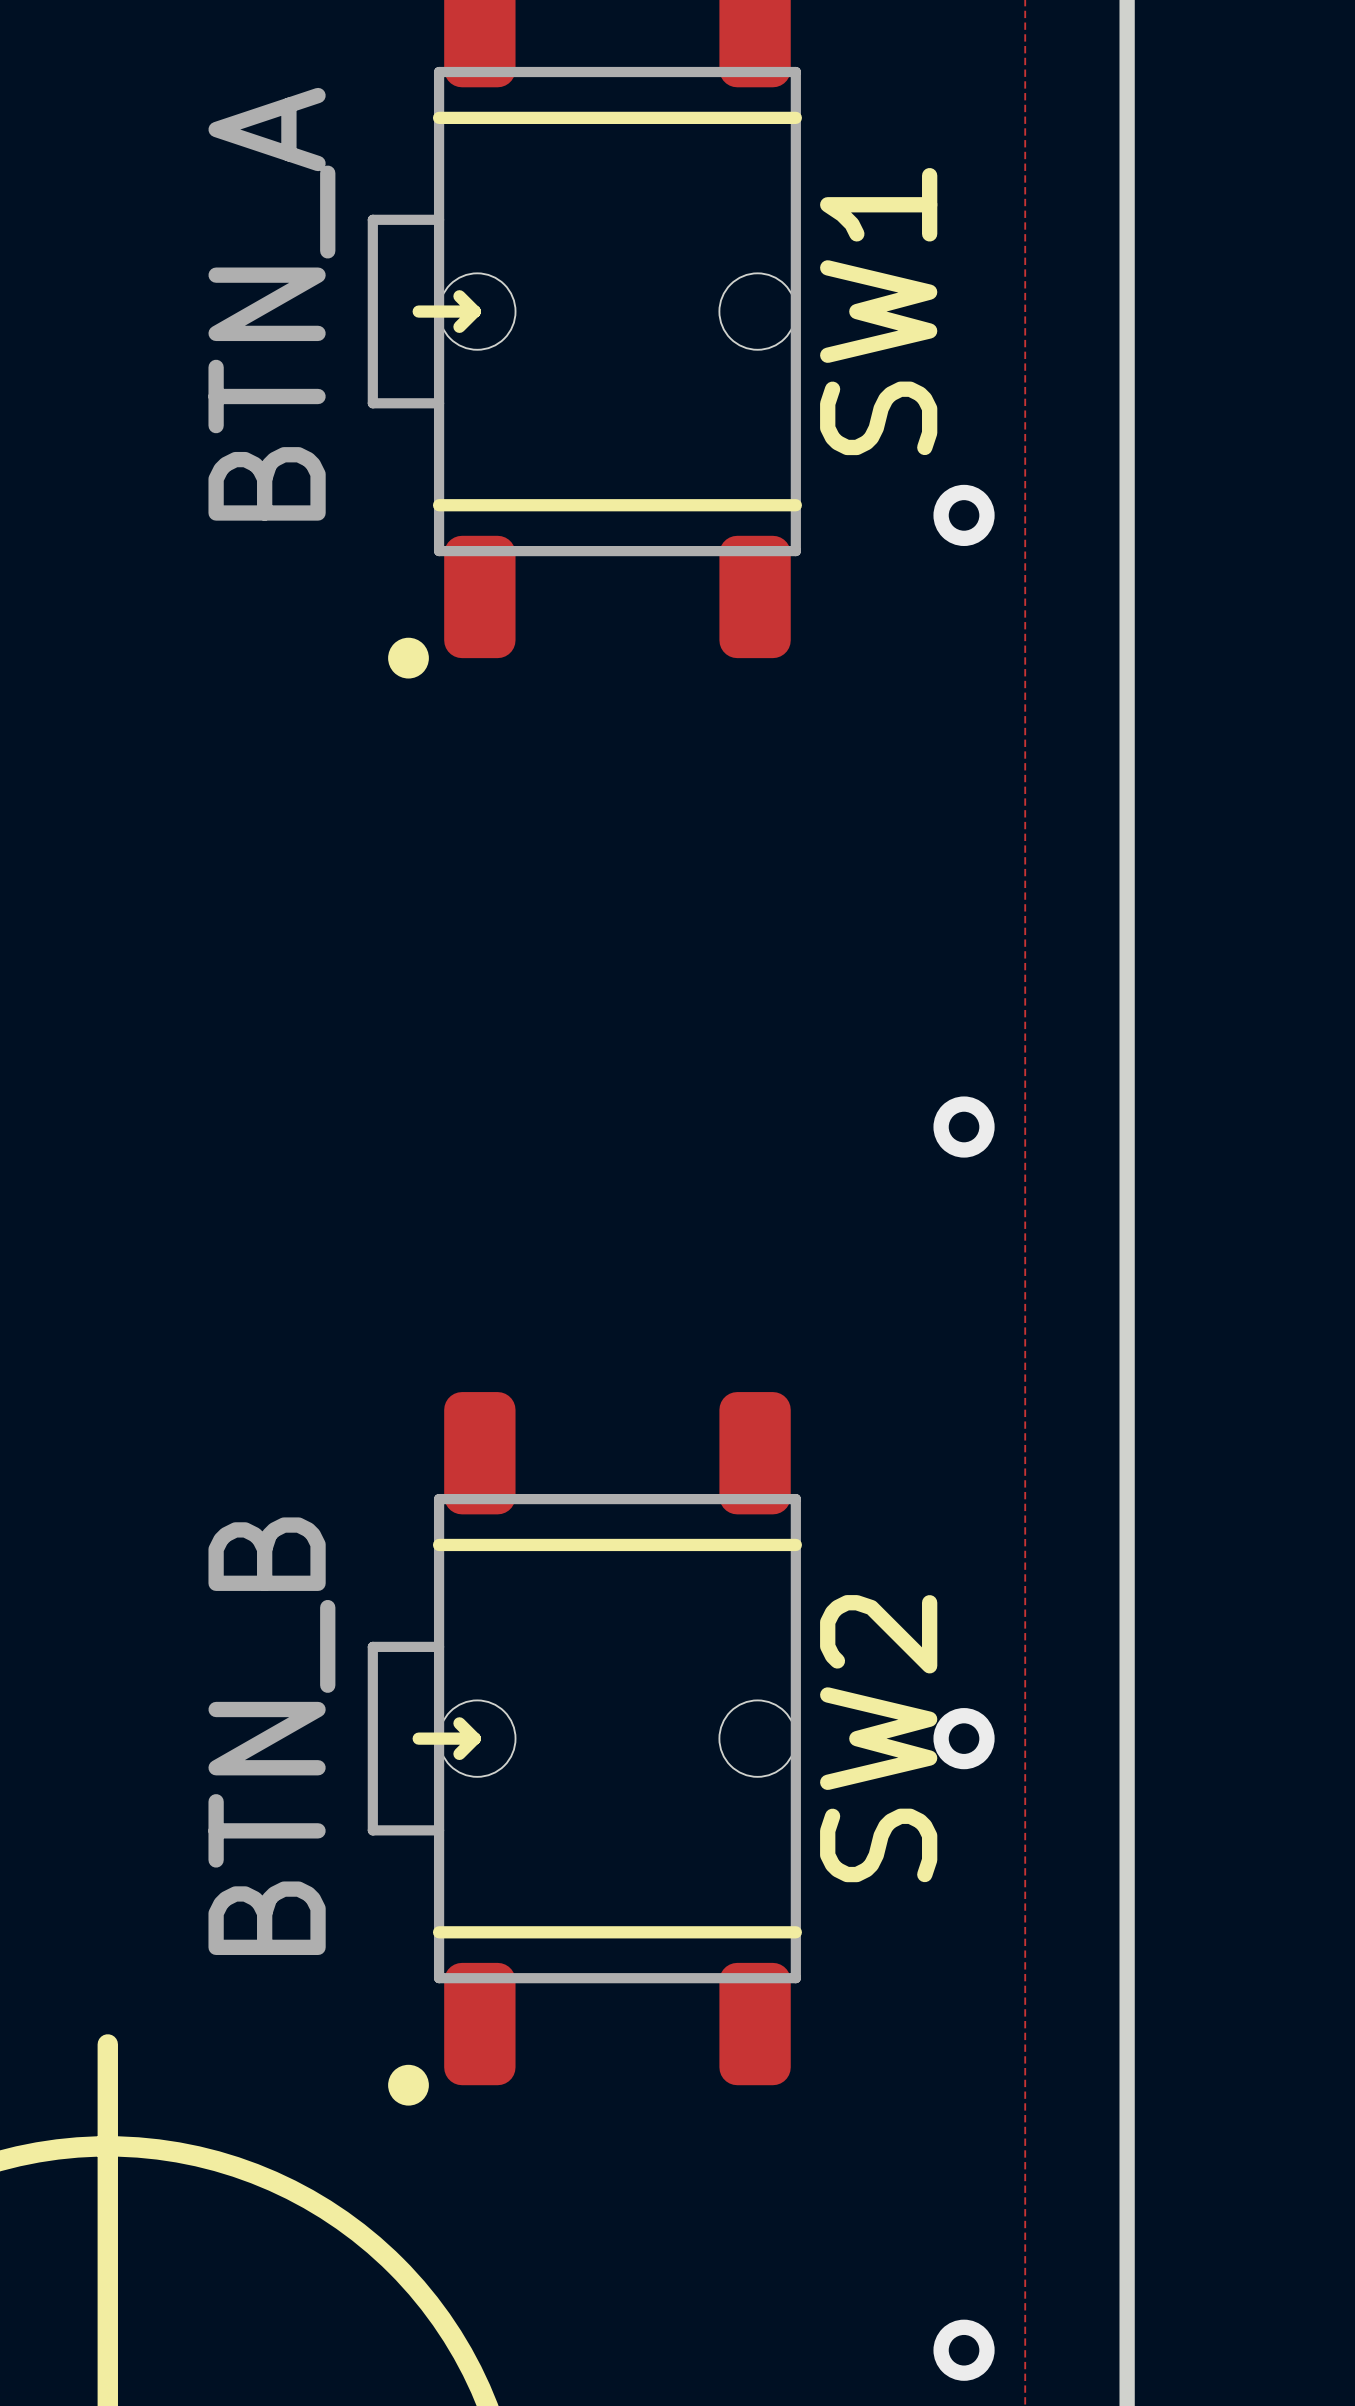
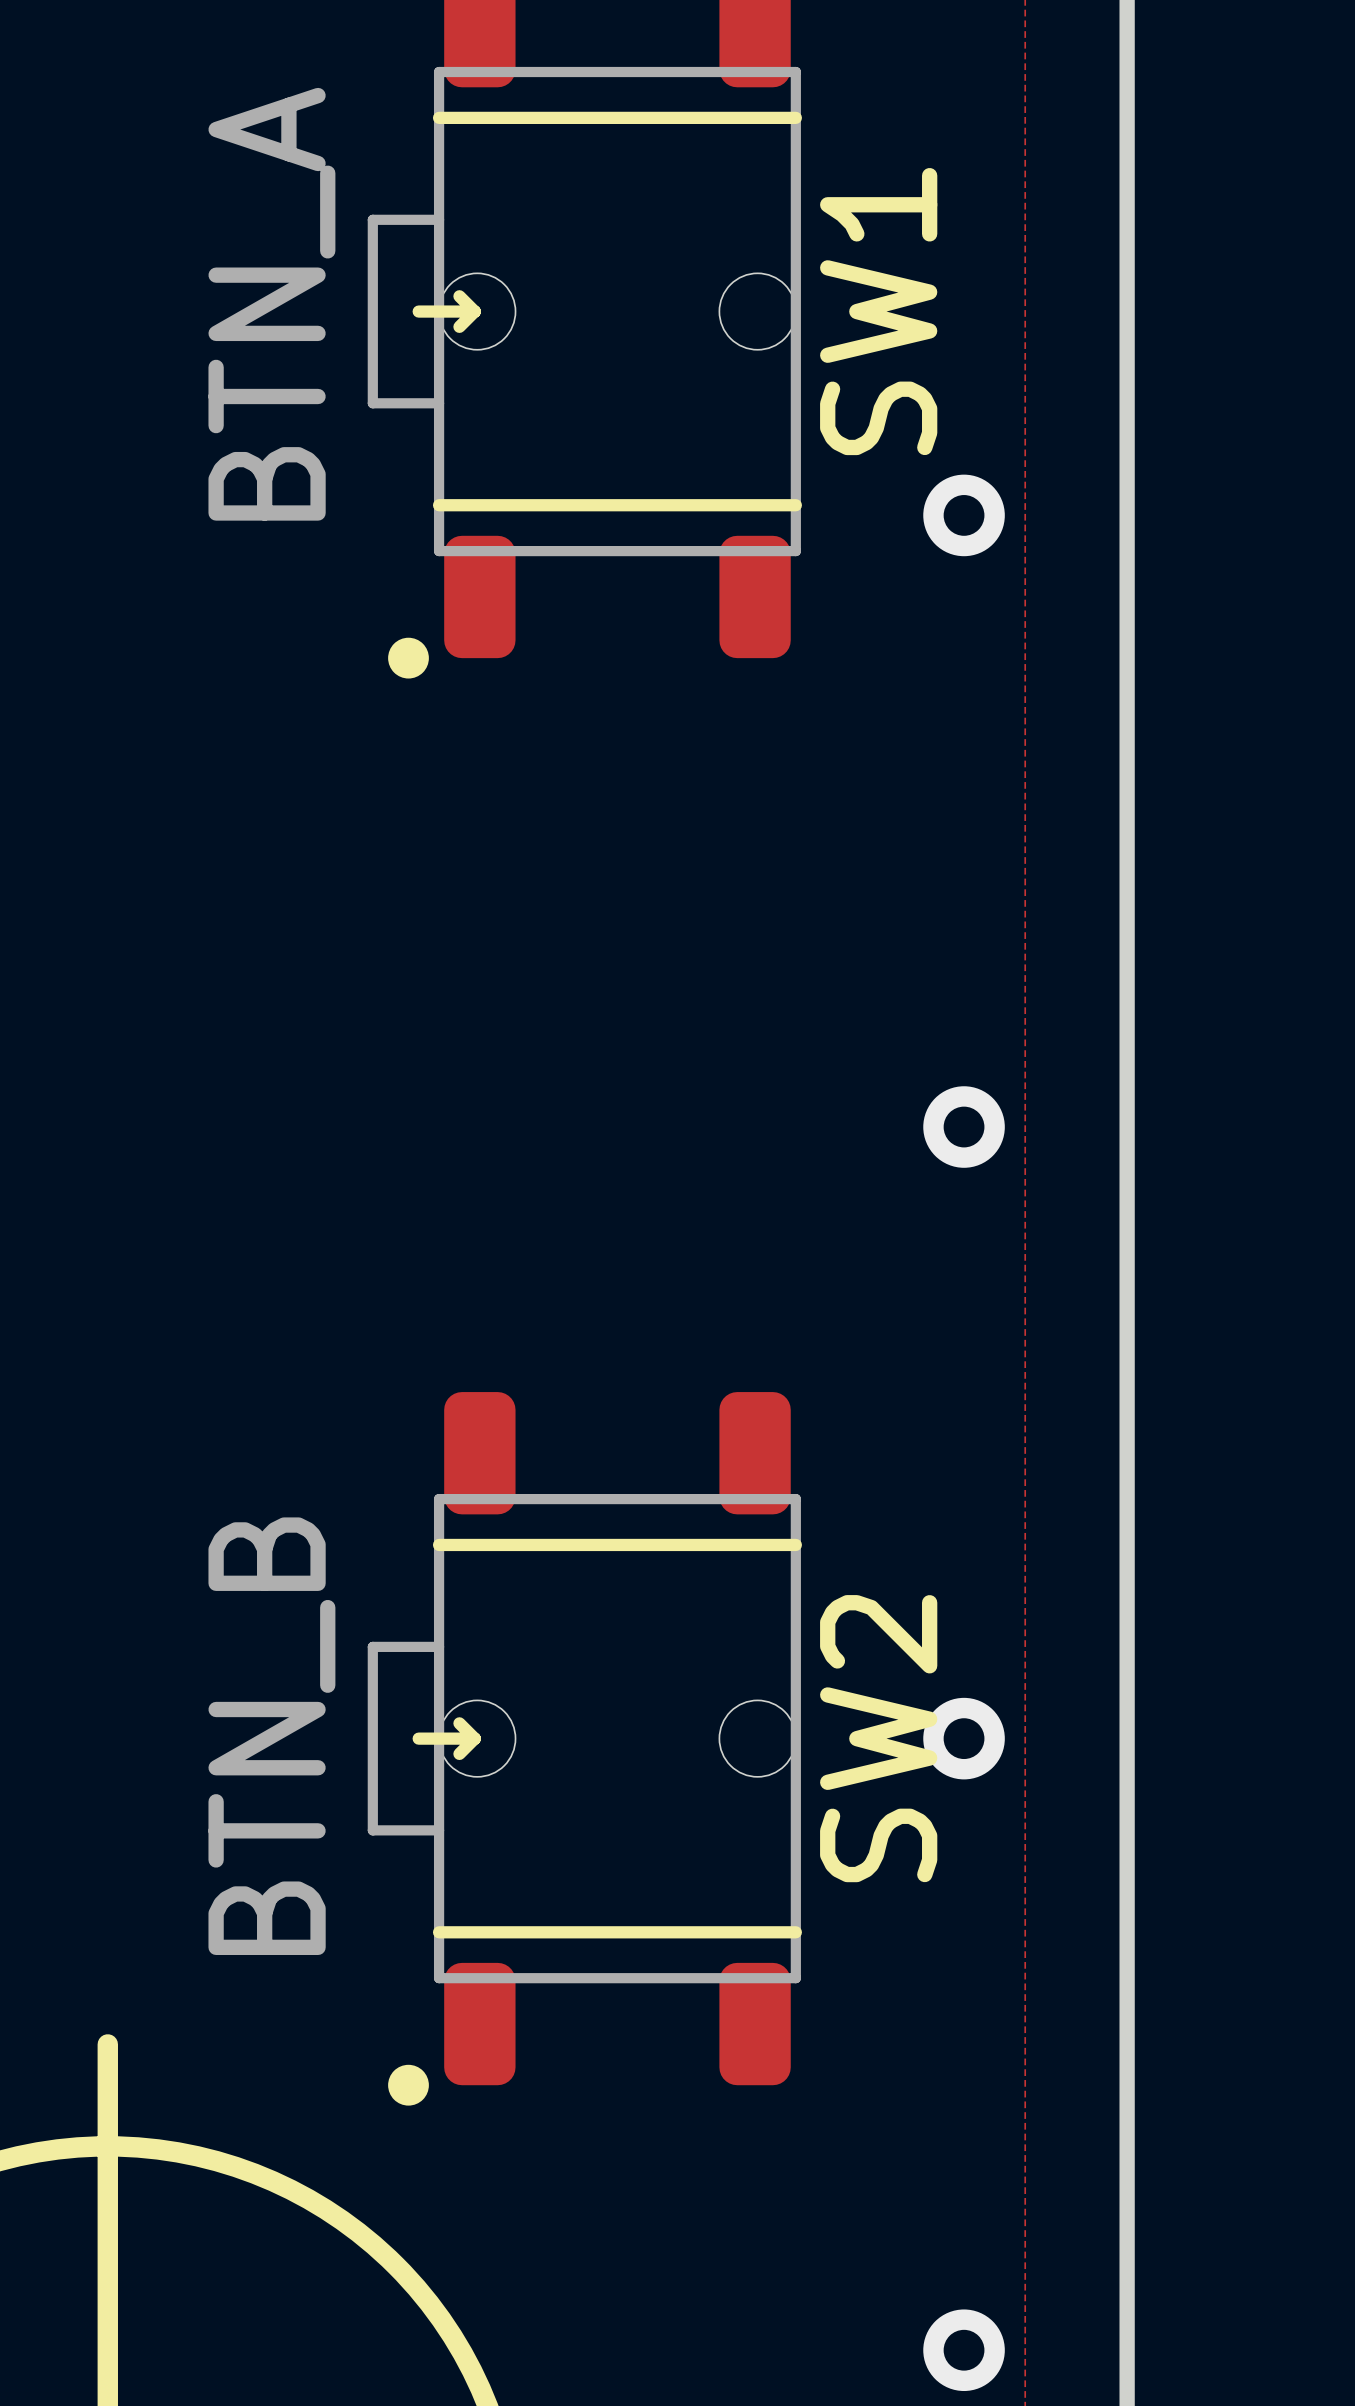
via size: [933, 484, 995, 547] -> [923, 474, 1005, 557]
via size: [933, 1096, 995, 1158] -> [923, 1086, 1005, 1168]
via size: [933, 1708, 995, 1770] -> [923, 1697, 1005, 1780]
via size: [933, 2319, 995, 2381] -> [923, 2309, 1005, 2392]

